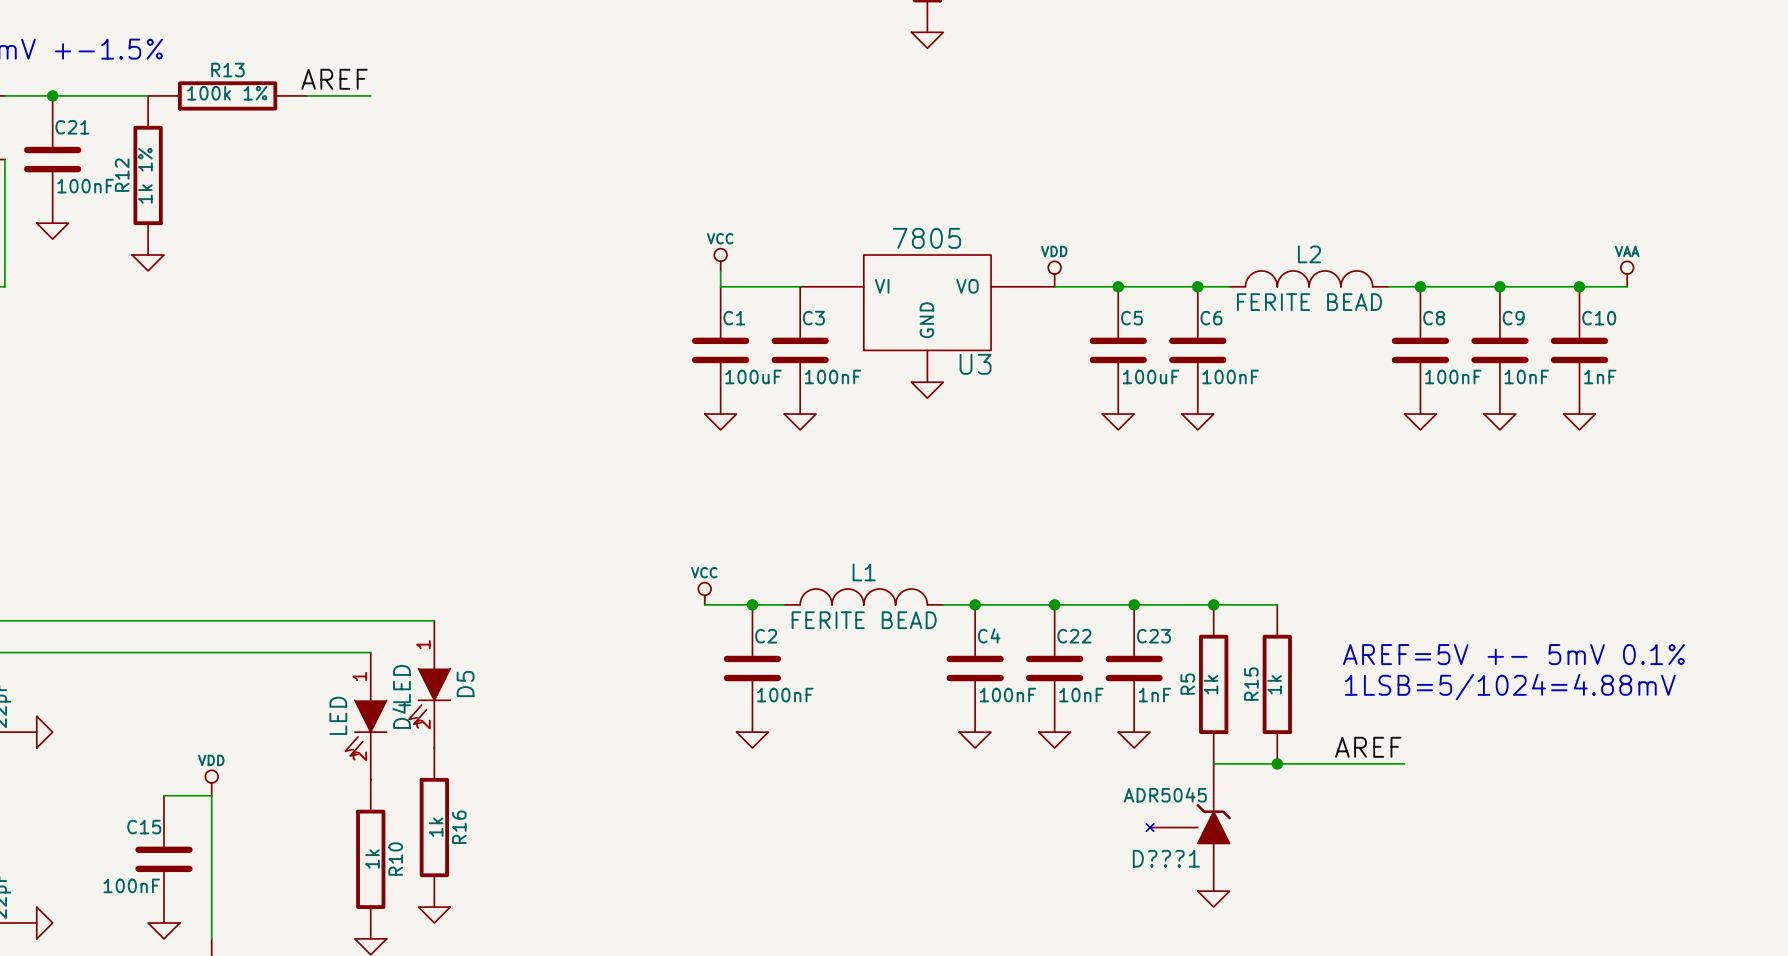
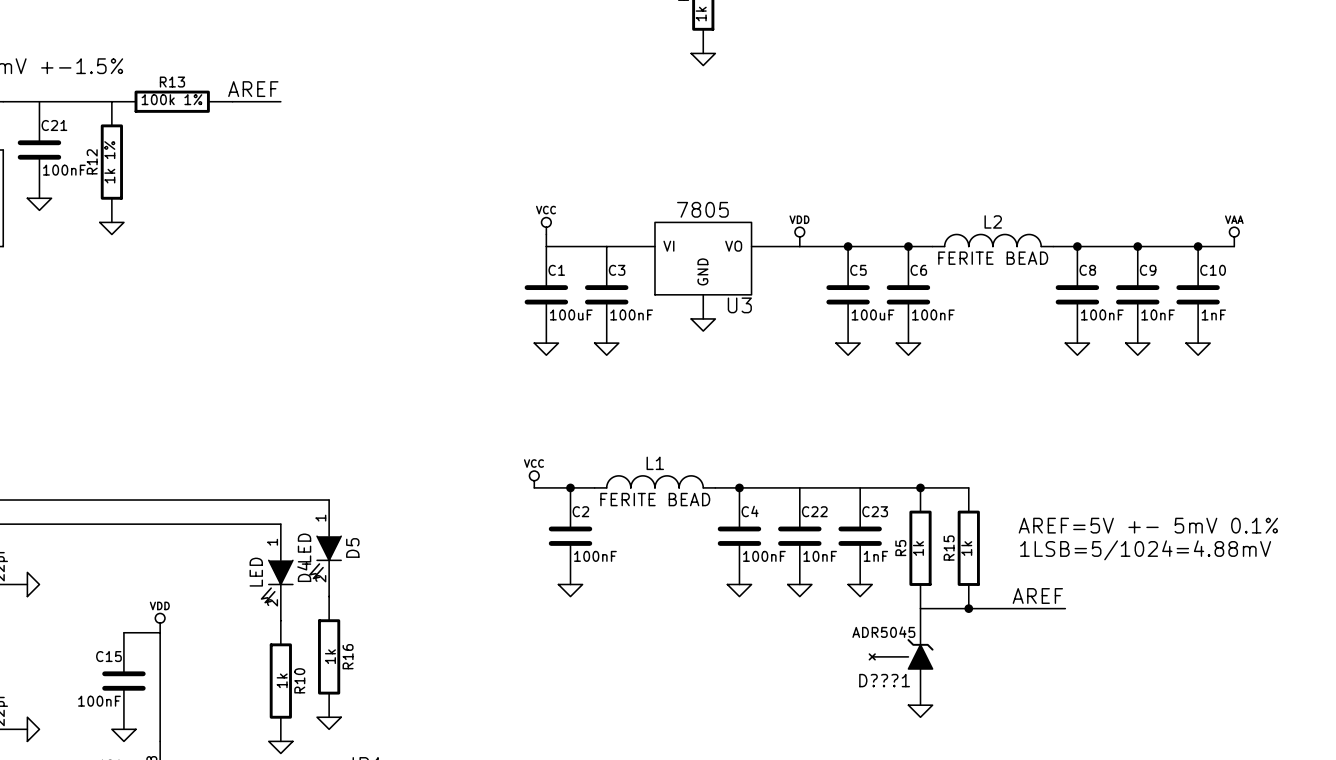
junction: (52, 95) -> none
junction: (1054, 604) -> none
junction: (1134, 604) -> none

